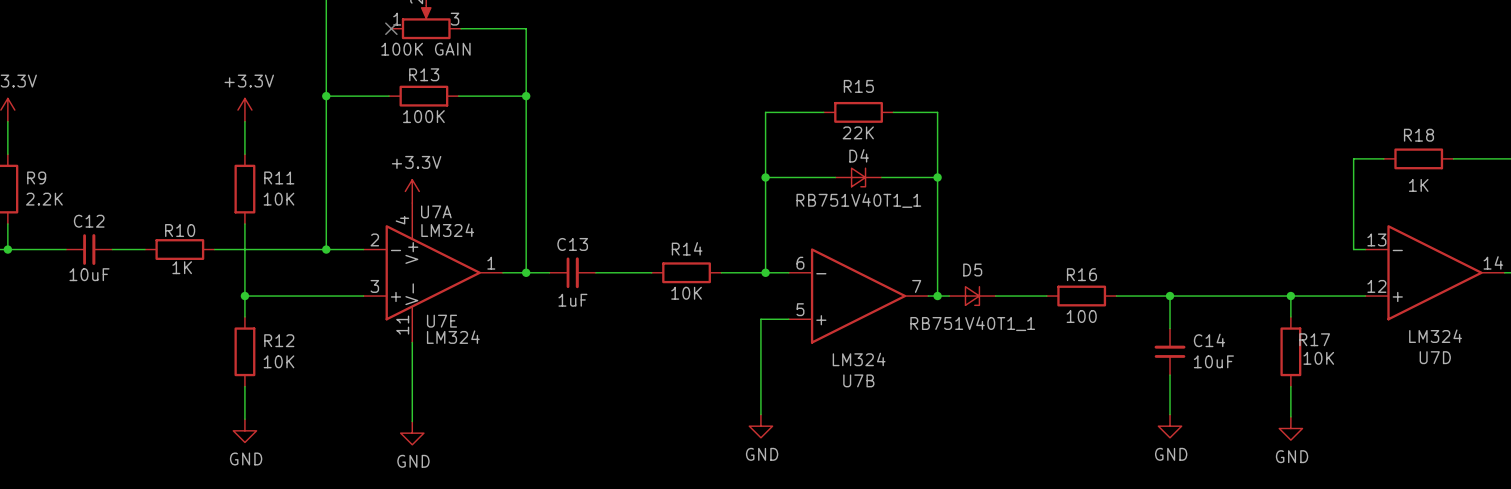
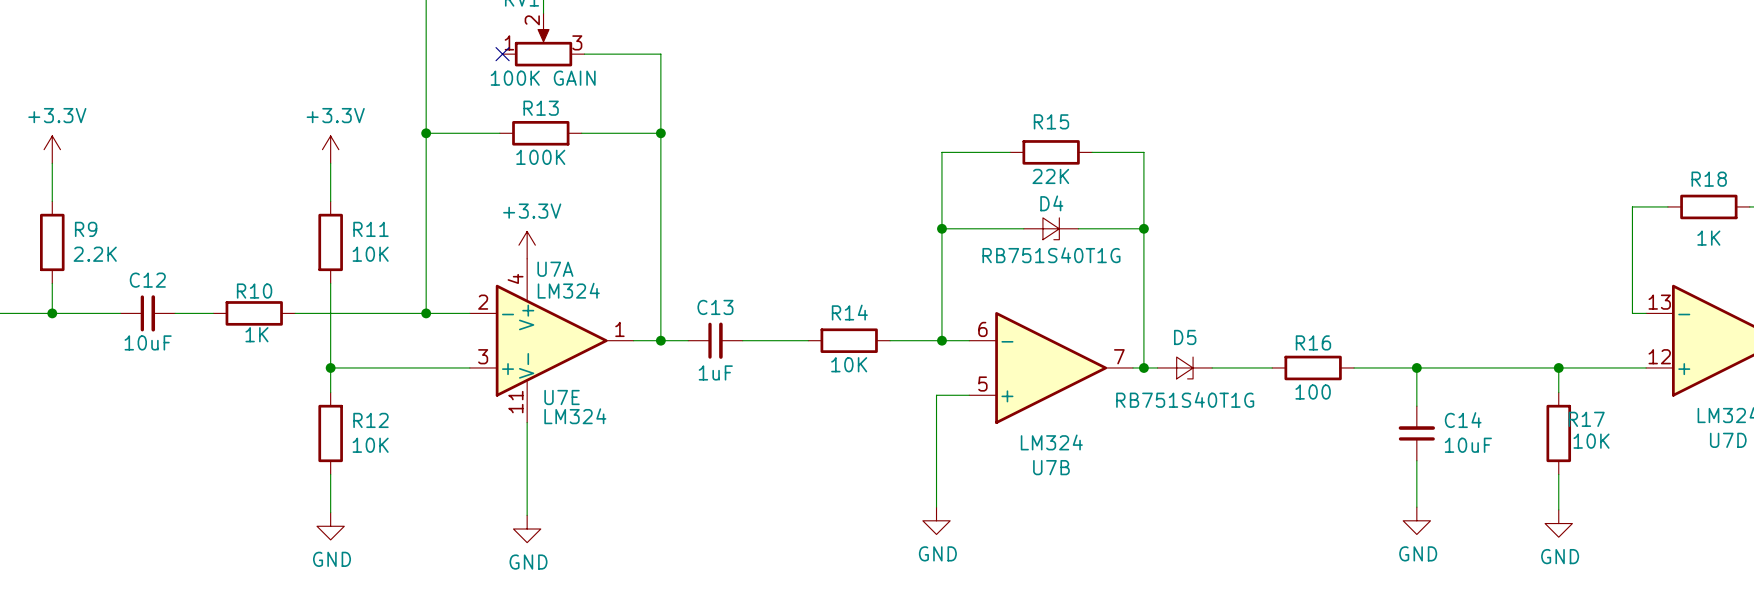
D4 value: RB751V40T1_1 (858, 200) -> RB751S40T1G (1051, 255)
D5 value: RB751V40T1_1 (972, 323) -> RB751S40T1G (1185, 399)

